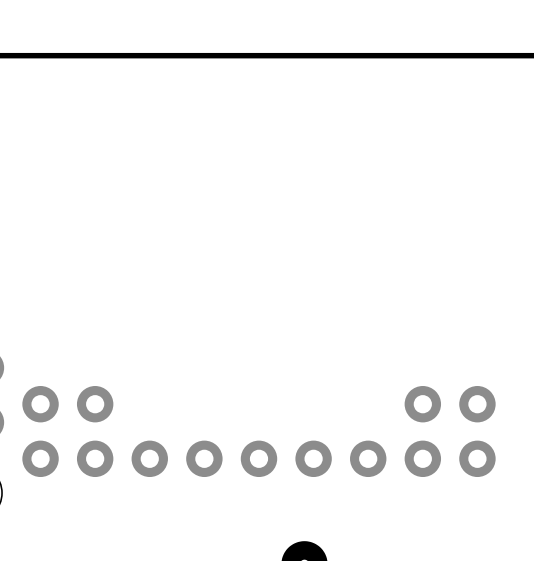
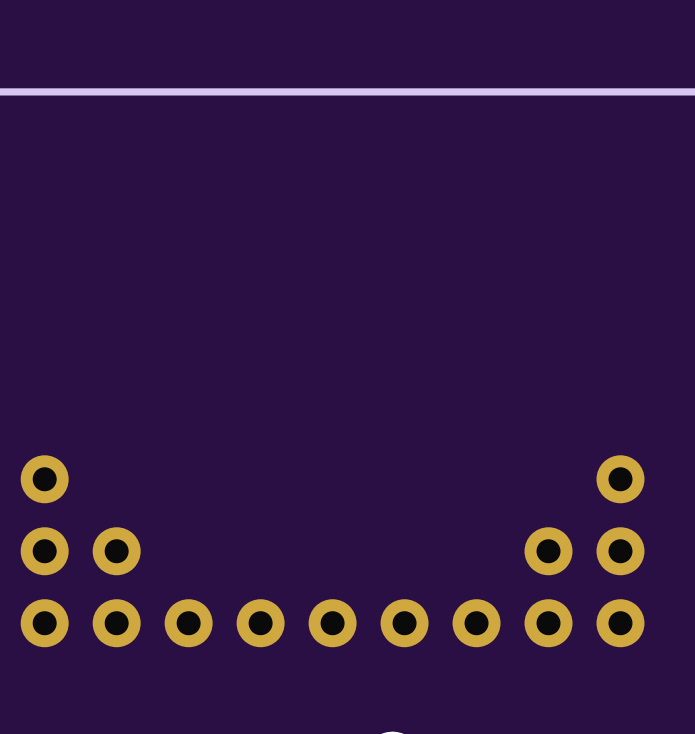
via: none -> (44, 479)
via: none -> (620, 479)

